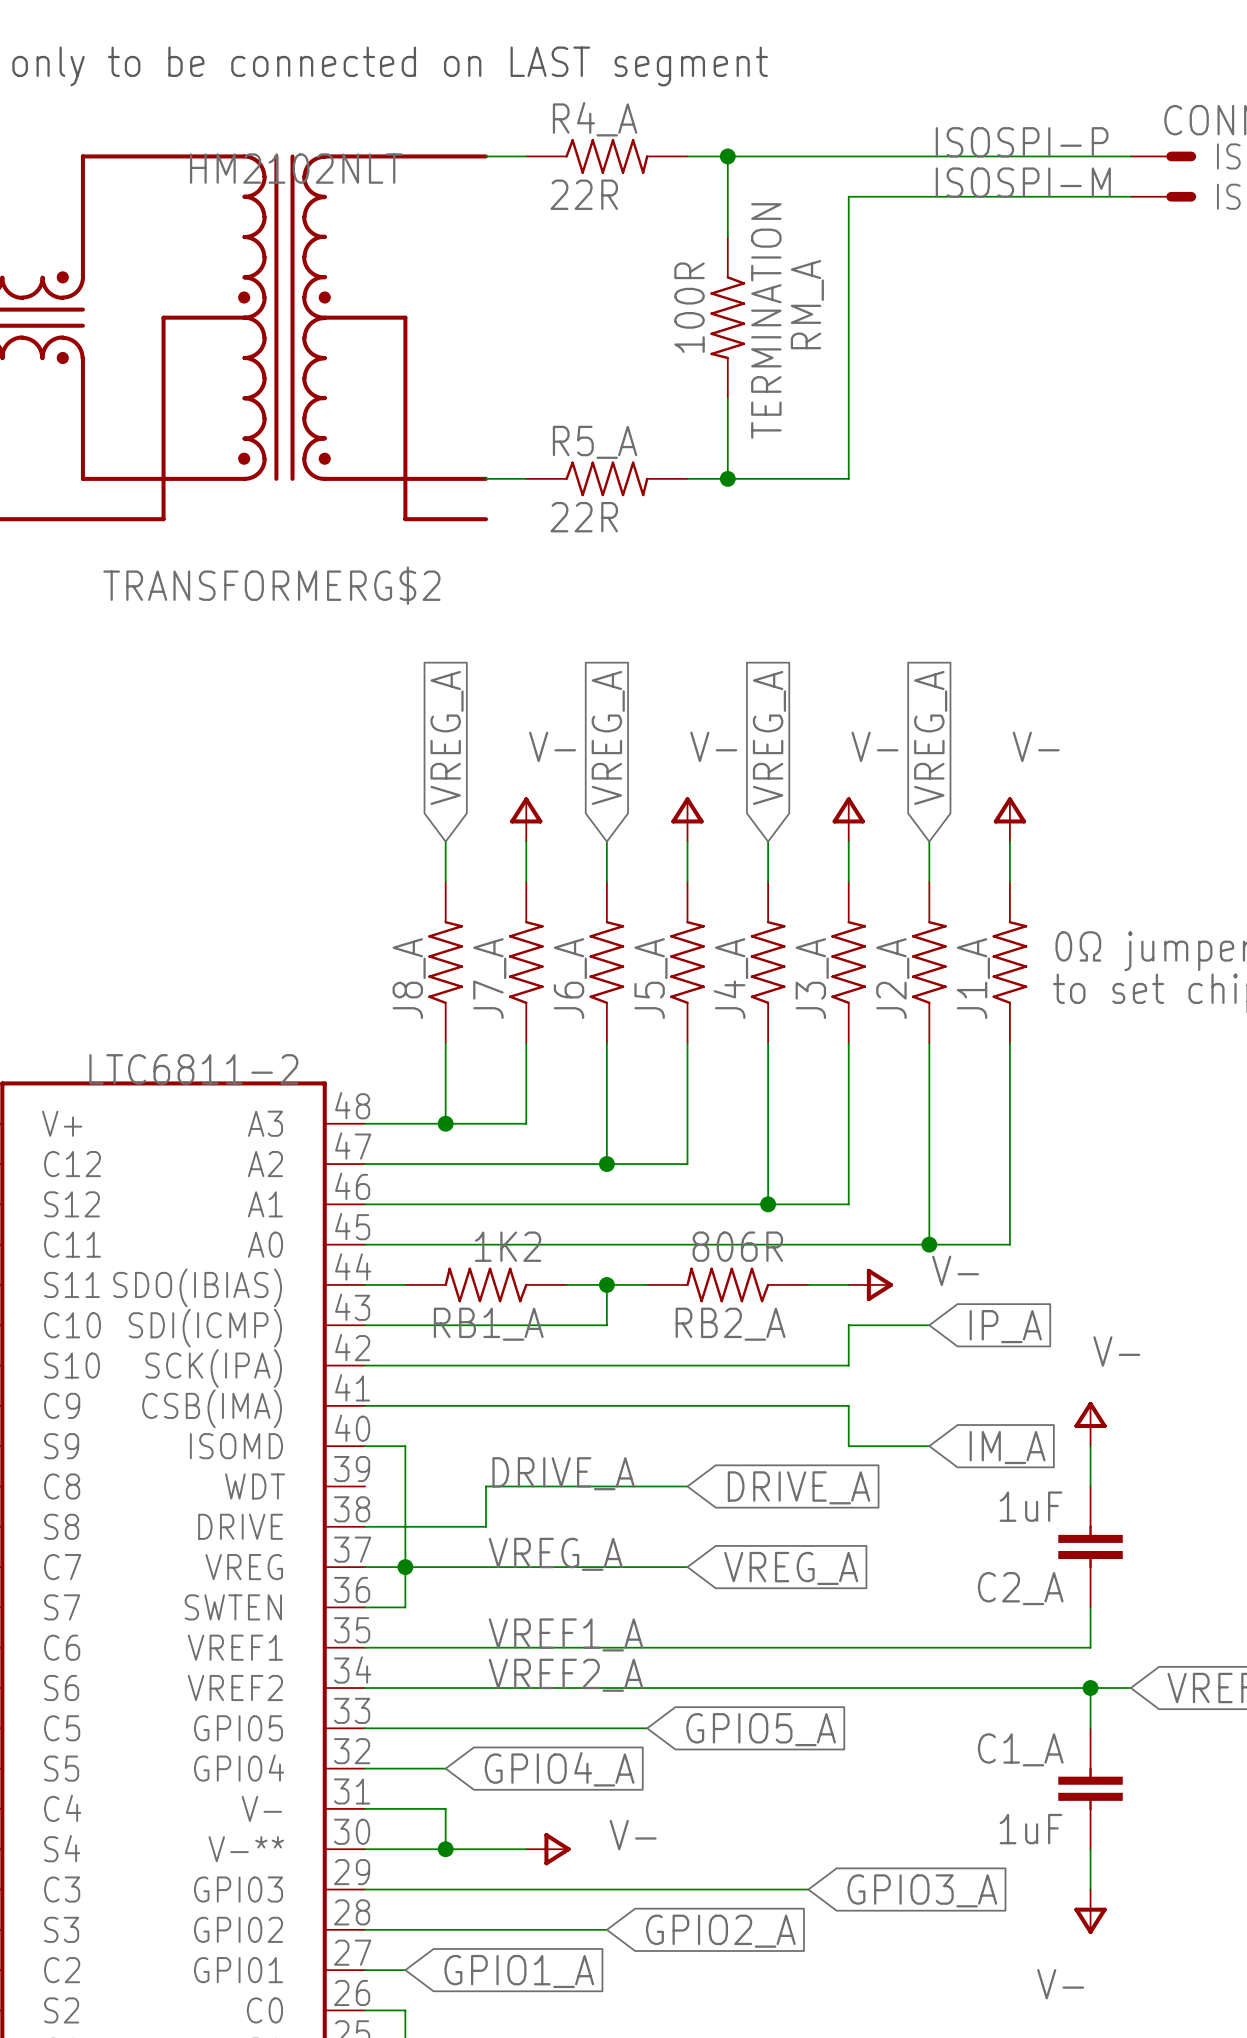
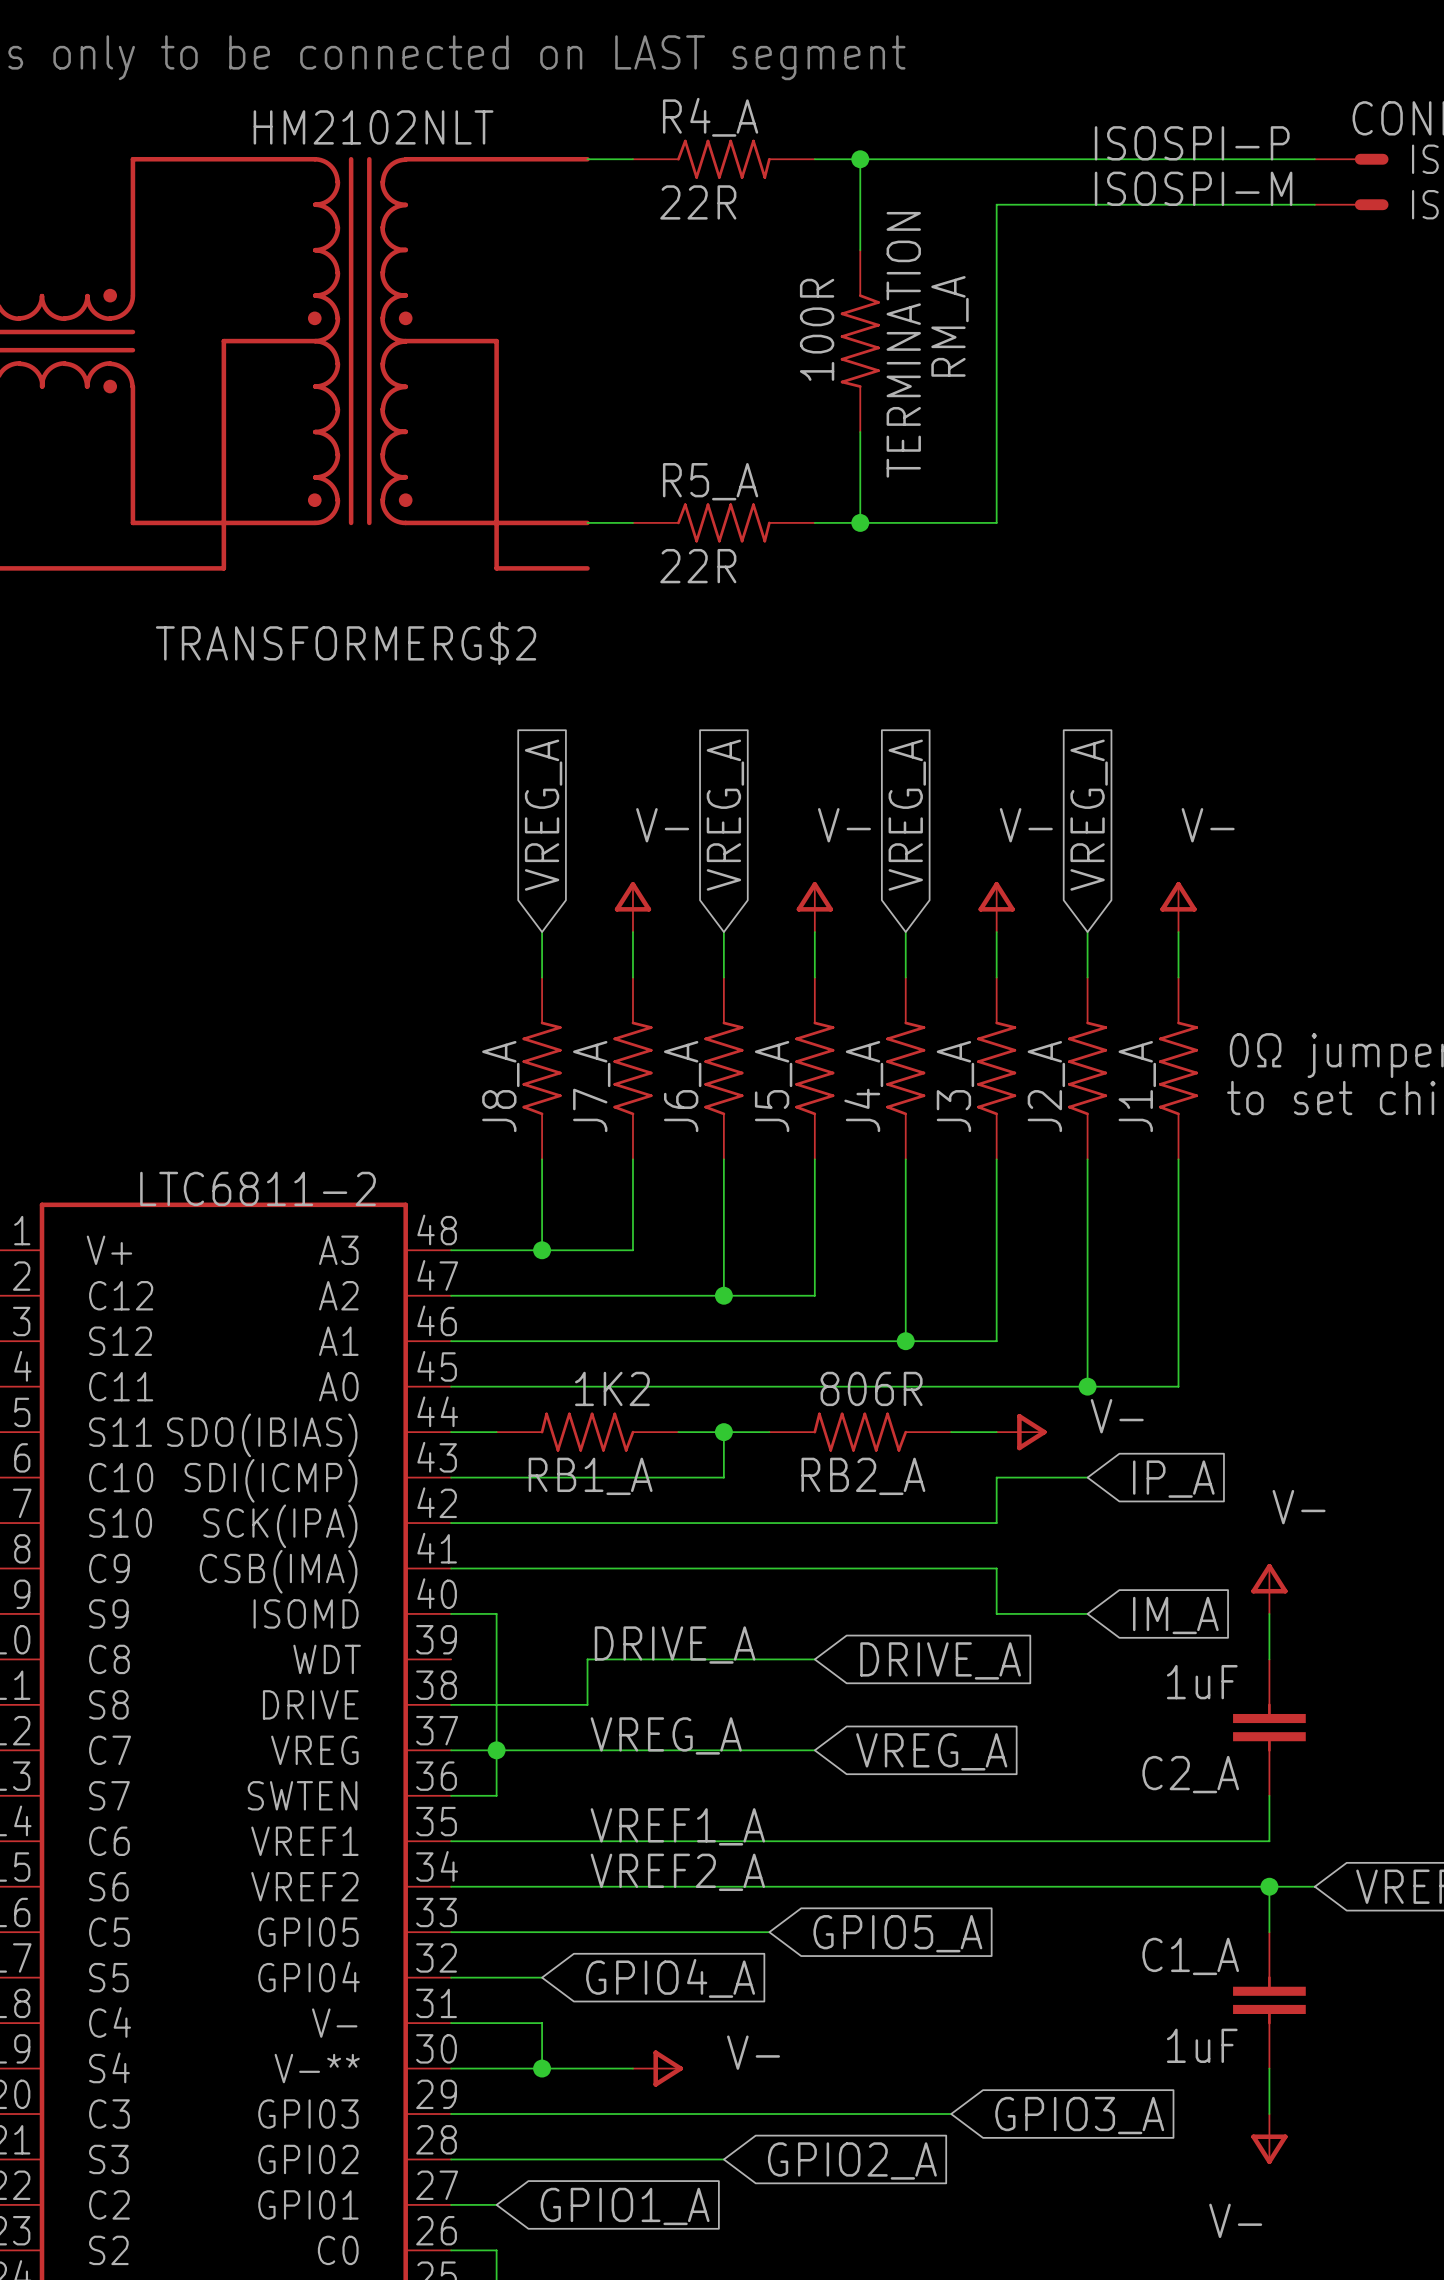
TRANSFORMERG$2 value position: HM2102NLT (296, 168) -> HM2102NLT (373, 127)

